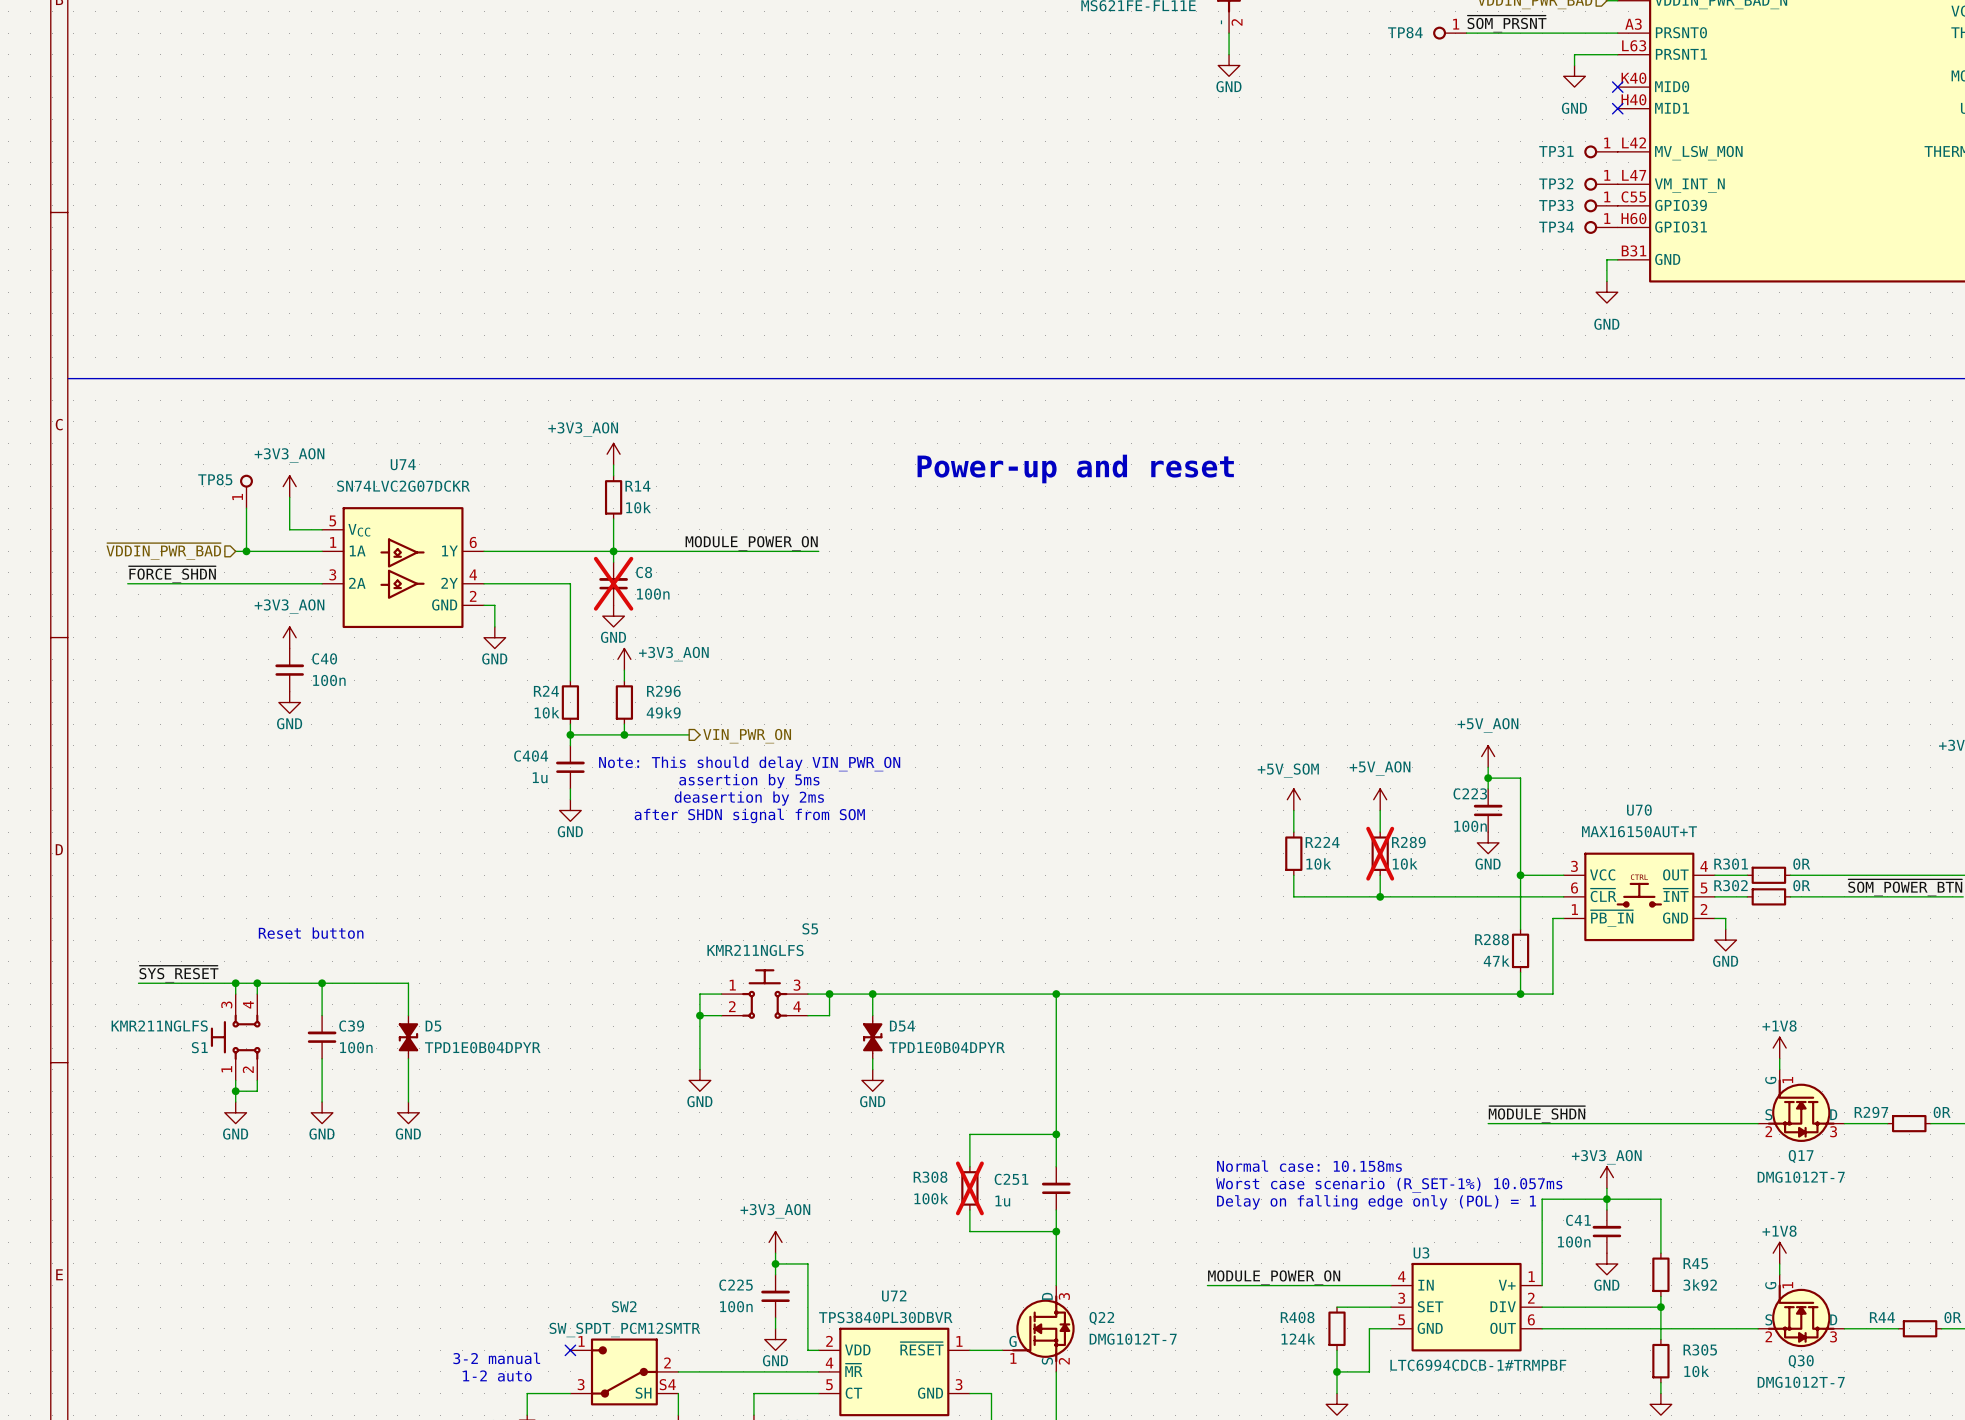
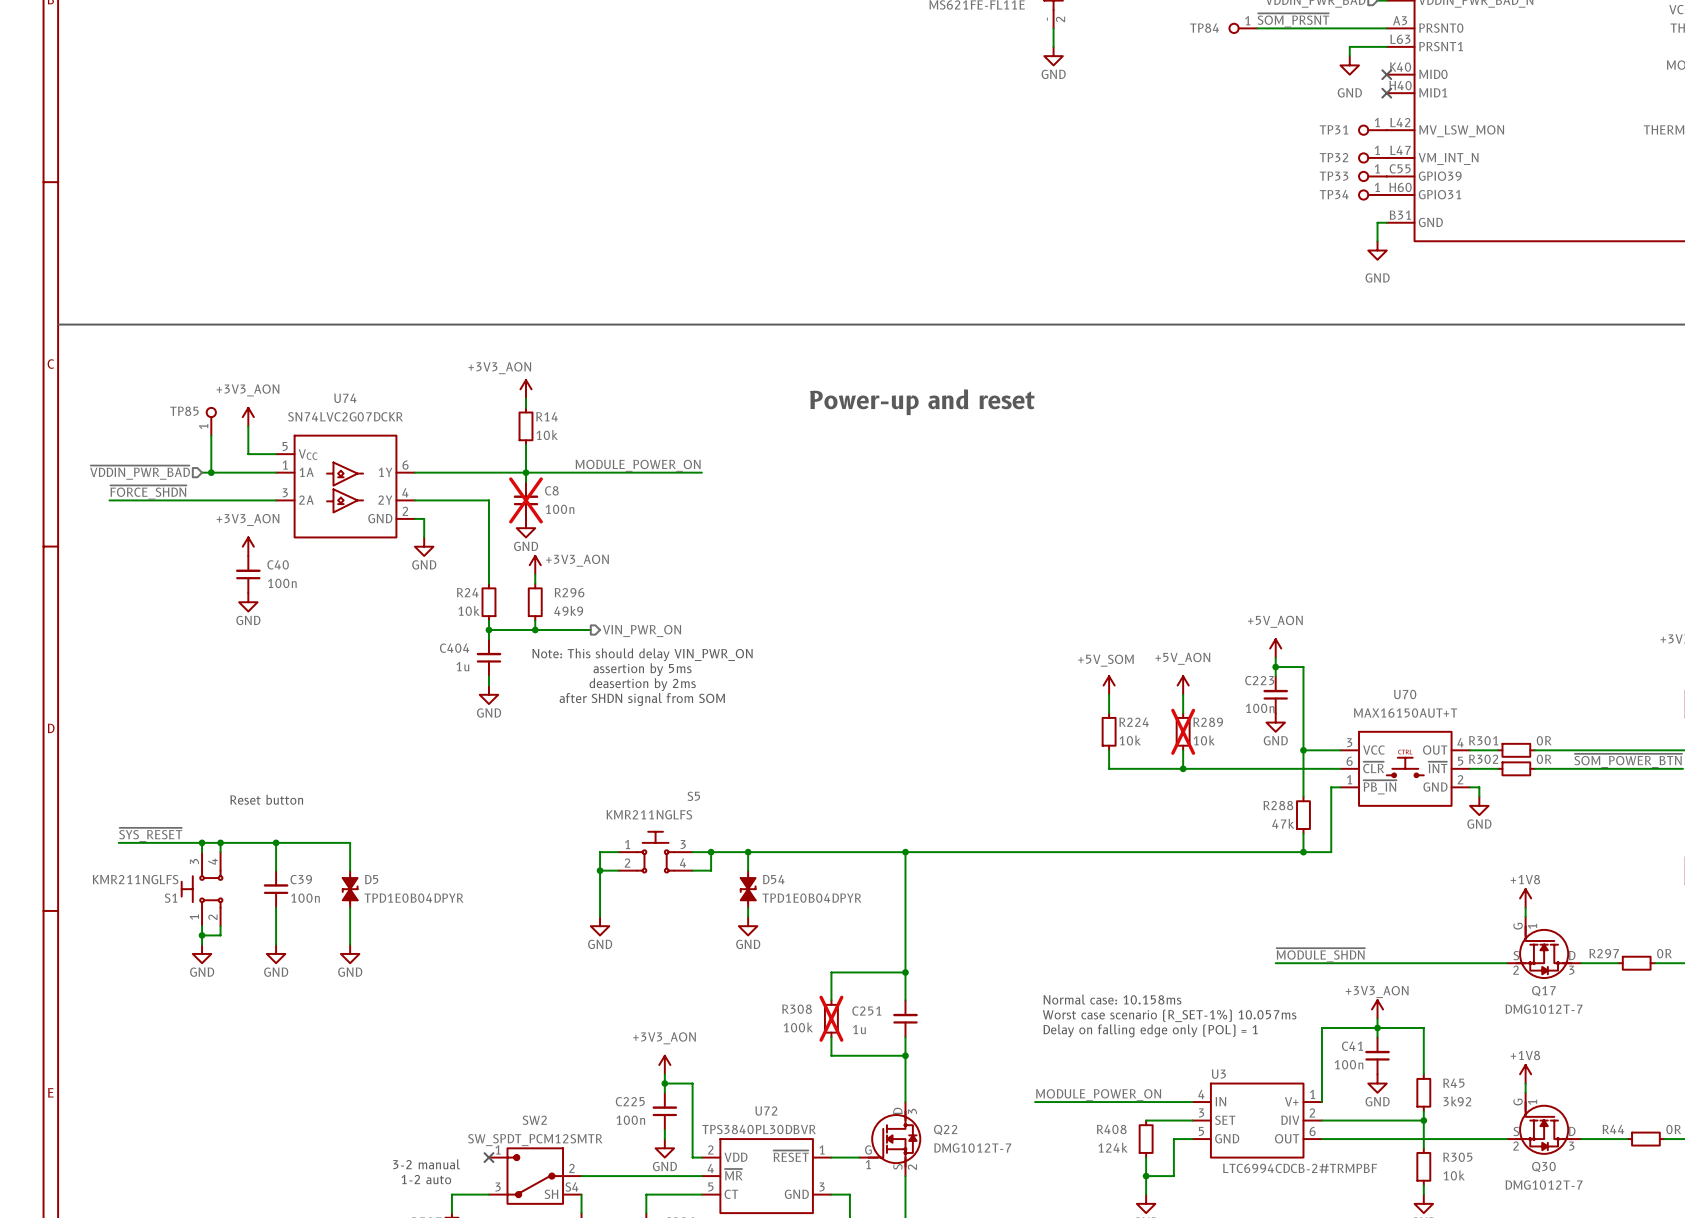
U3 text: LTC6994CDCB-1#TRMPBF (1478, 1365) -> LTC6994CDCB-2#TRMPBF (1300, 1168)

